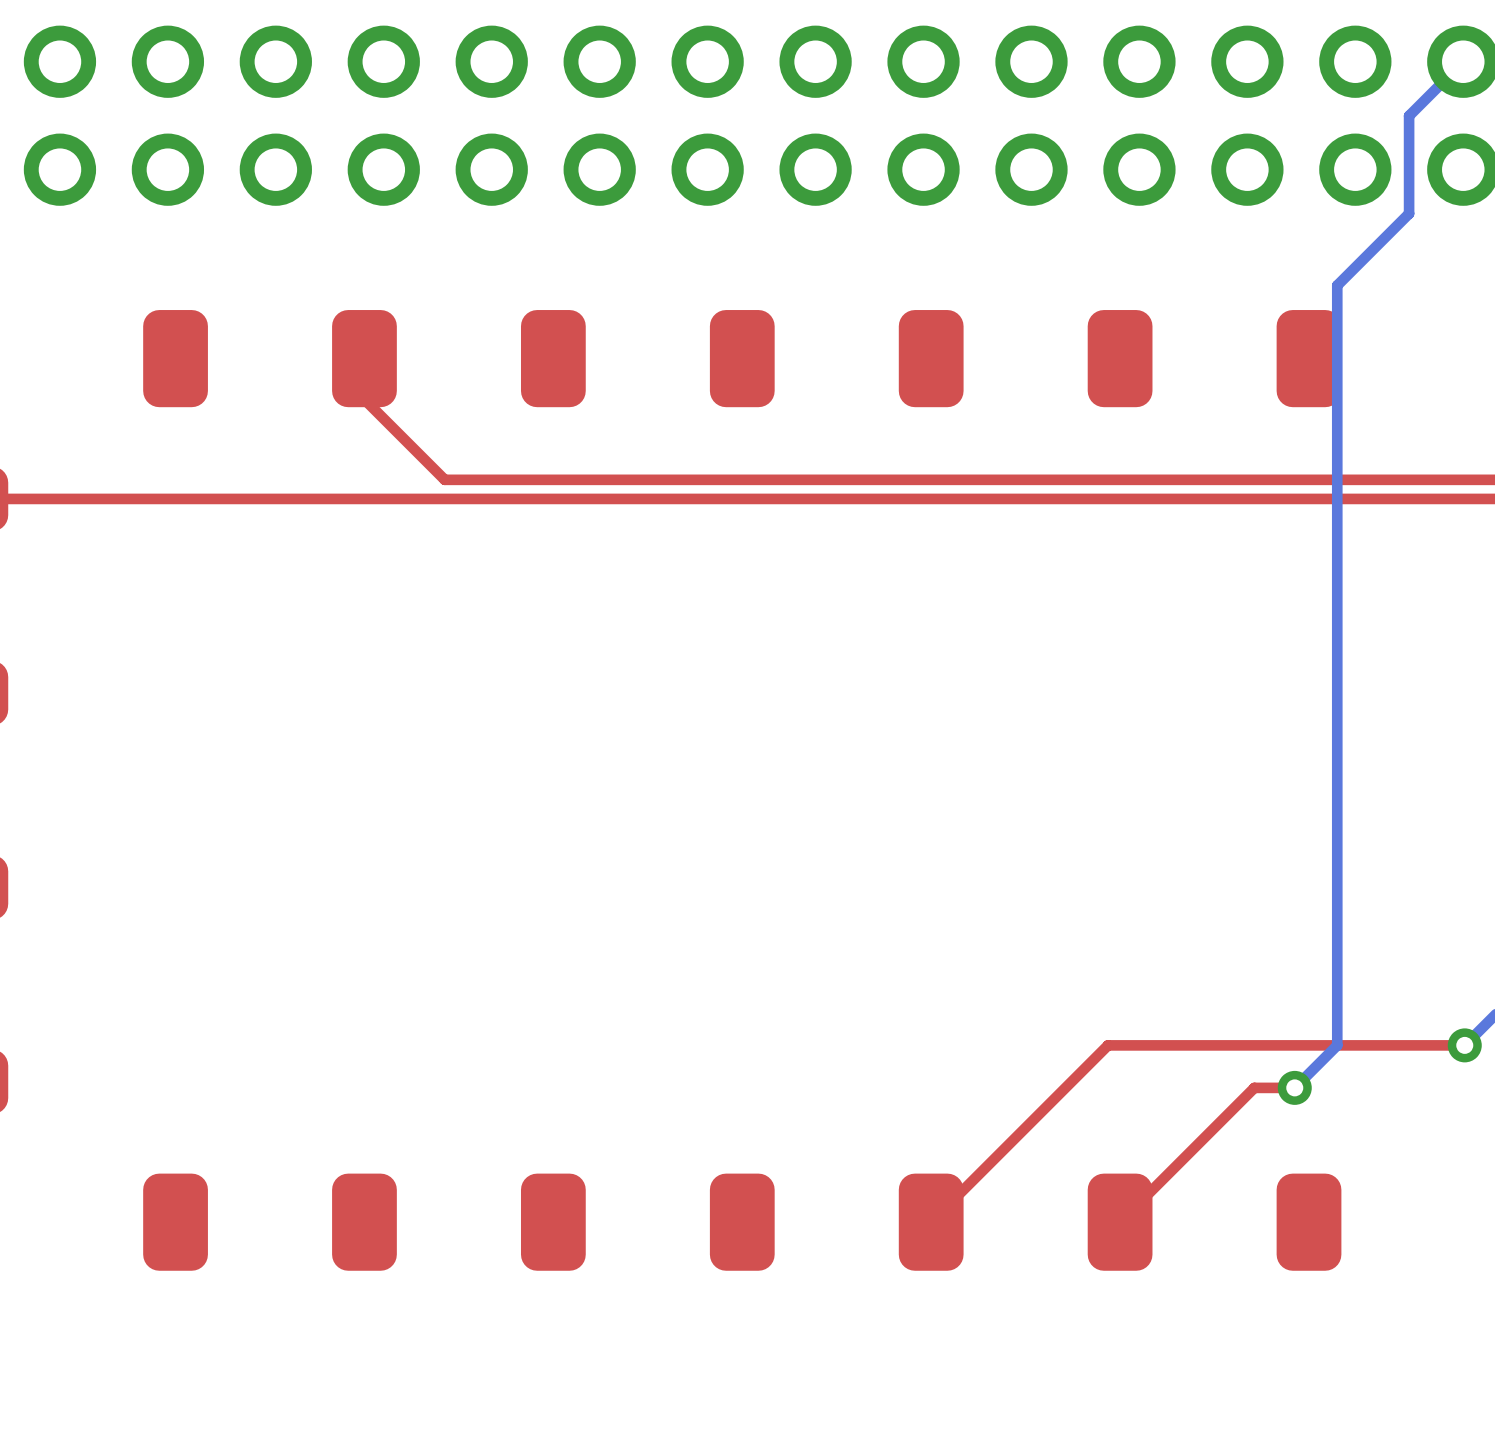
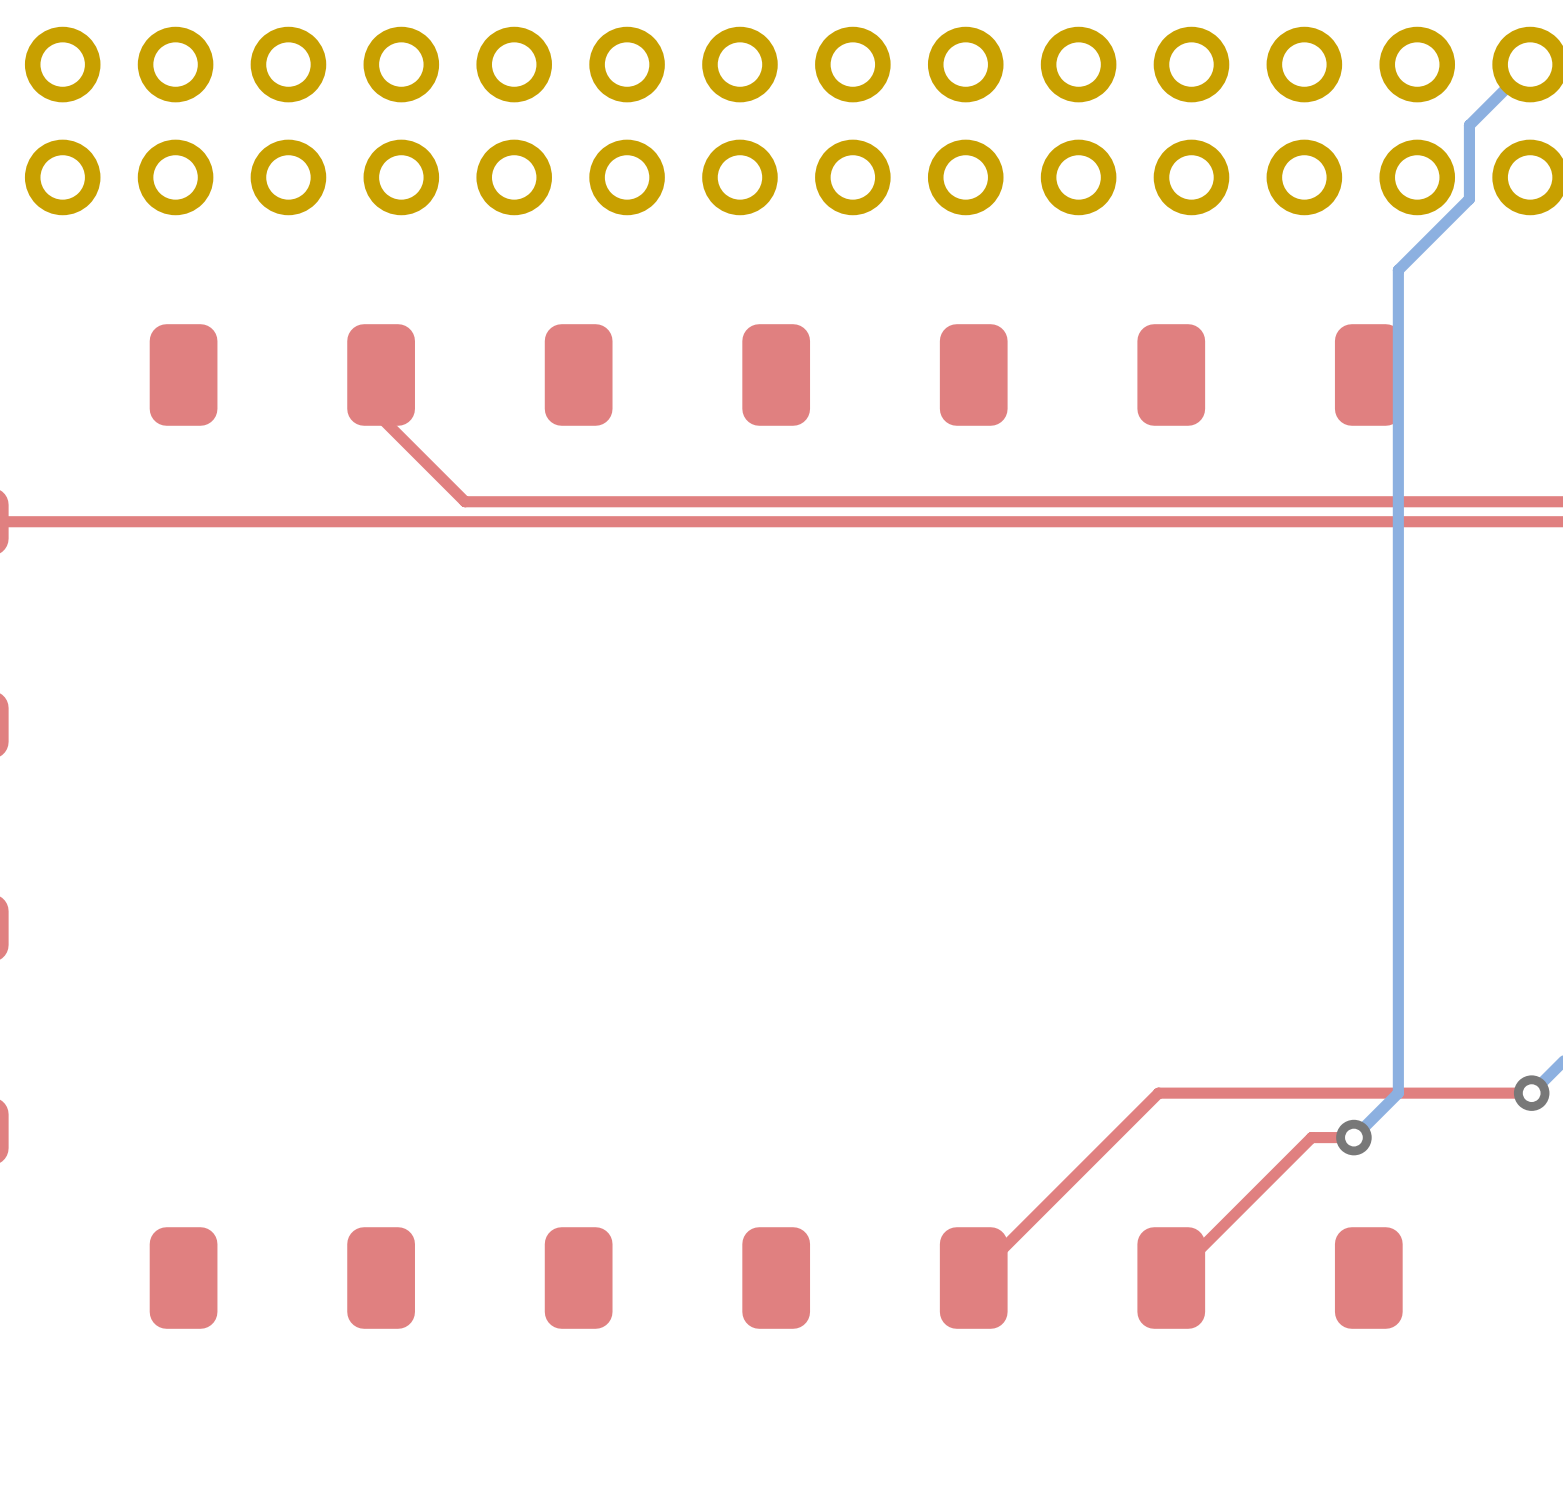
bottom track: (1409, 115) (1409, 213) (1337, 285) -> (1473, 121) (1469, 125) (1469, 199) (1398, 270) (1398, 298)

